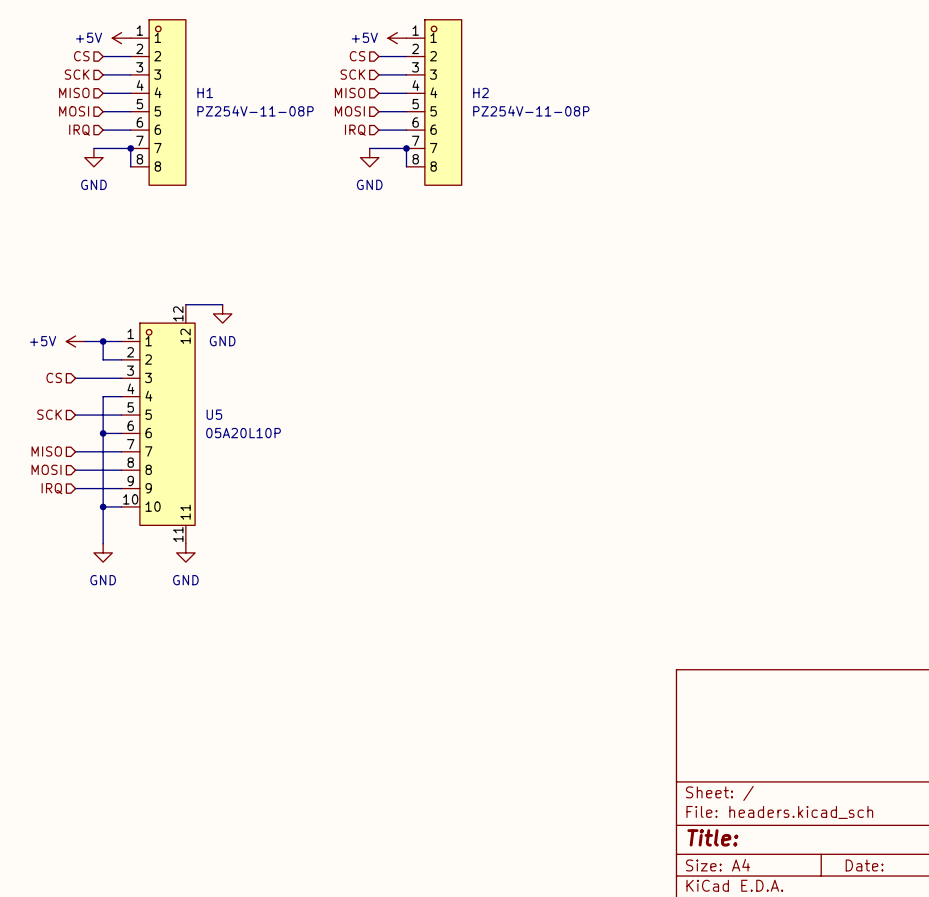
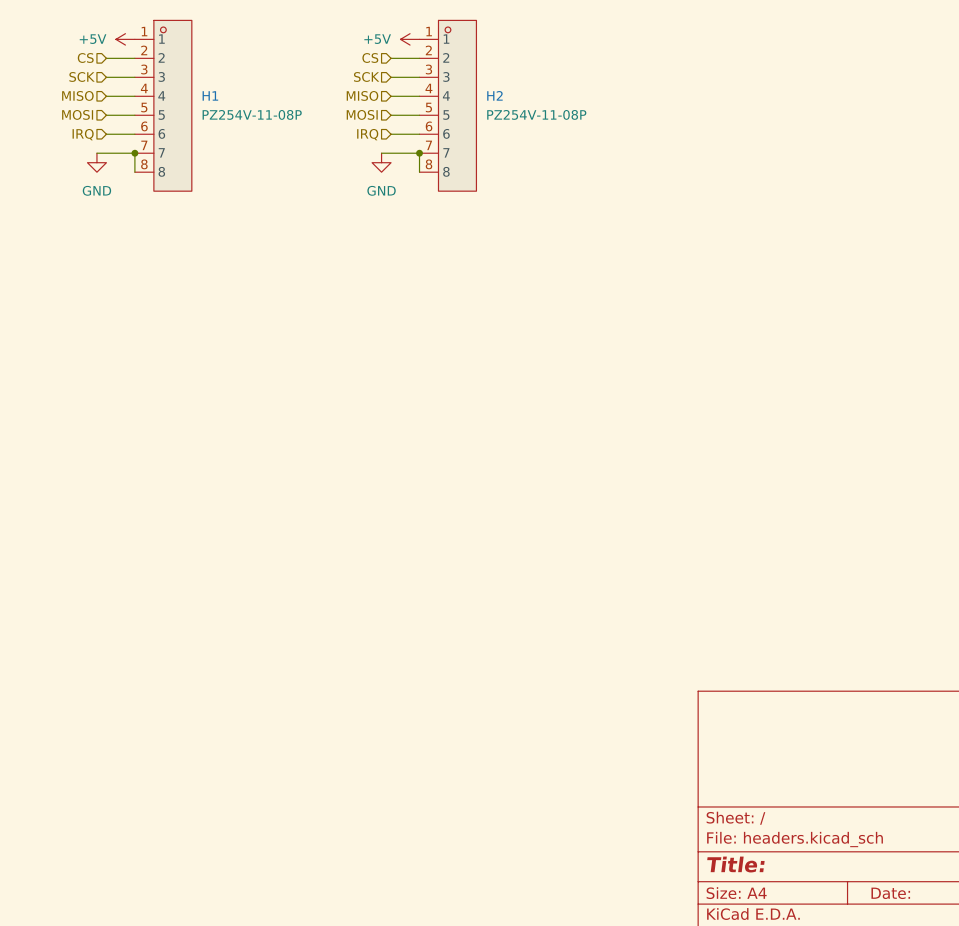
wire: (185, 304) (222, 304) -> none
power symbol: GND (222, 313) -> none
power symbol: +5V (75, 341) -> none
wire: (84, 341) (121, 341) -> none
wire: (103, 341) (103, 359) (121, 359) -> none
junction: (103, 341) -> none
hierarchical label: CS (54, 377) -> none
wire: (75, 378) (121, 378) -> none
wire: (121, 396) (103, 396) (103, 543) -> none
hierarchical label: SCK (49, 414) -> none
wire: (75, 415) (121, 415) -> none
U5: 05A20L10P (158, 424) -> none
wire: (103, 433) (121, 433) -> none
junction: (103, 433) -> none
hierarchical label: MISO (46, 451) -> none
wire: (75, 451) (121, 451) -> none
hierarchical label: MOSI (46, 469) -> none
wire: (75, 470) (121, 470) -> none
hierarchical label: IRQ (52, 488) -> none
wire: (75, 488) (121, 488) -> none
wire: (103, 506) (121, 506) -> none
junction: (103, 506) -> none
power symbol: GND (103, 552) -> none
power symbol: GND (185, 552) -> none

